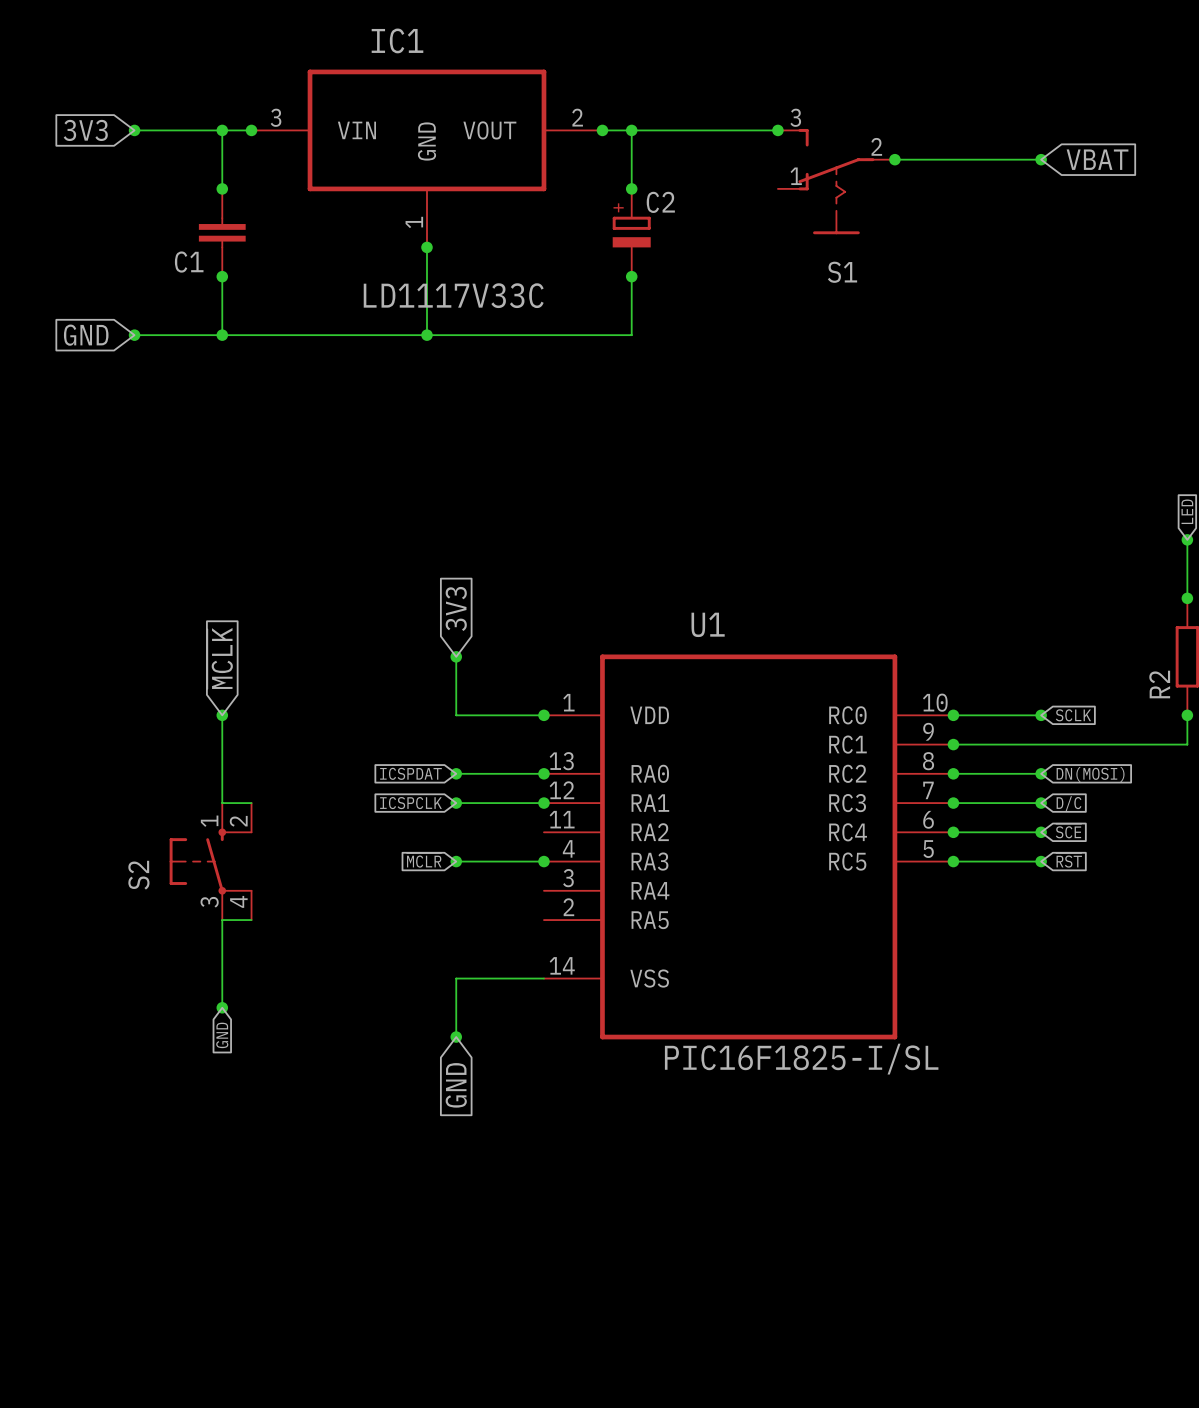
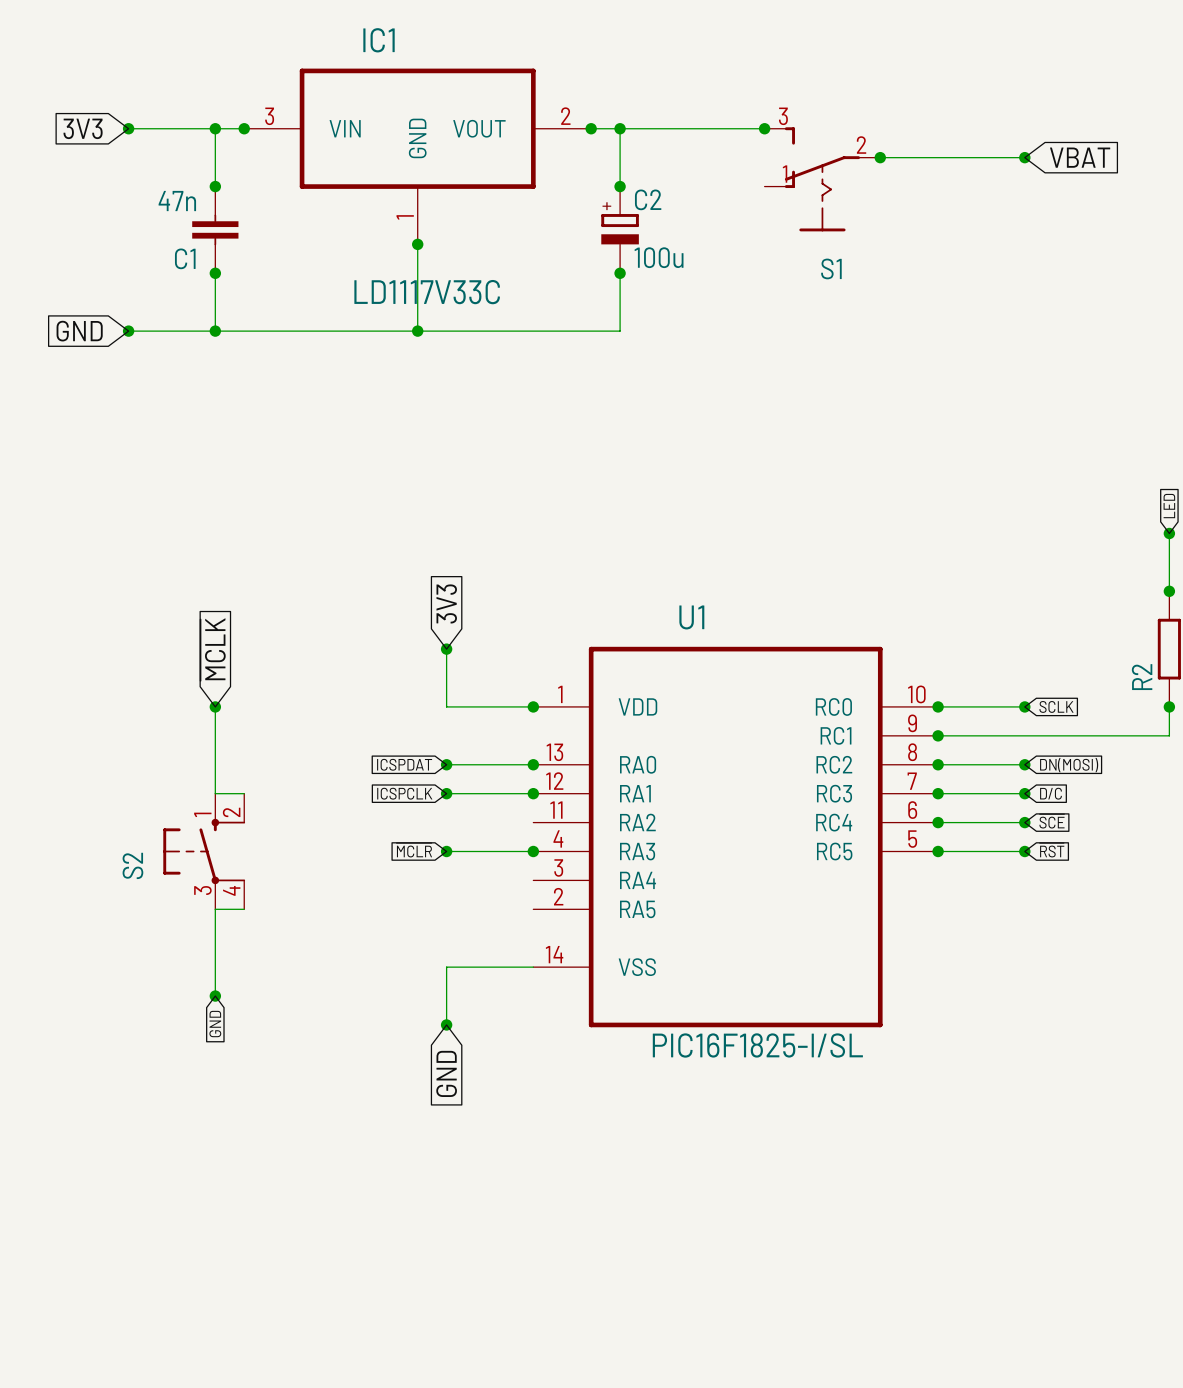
C1 value: none -> 47n (177, 201)
C2 value: none -> 100u (659, 257)

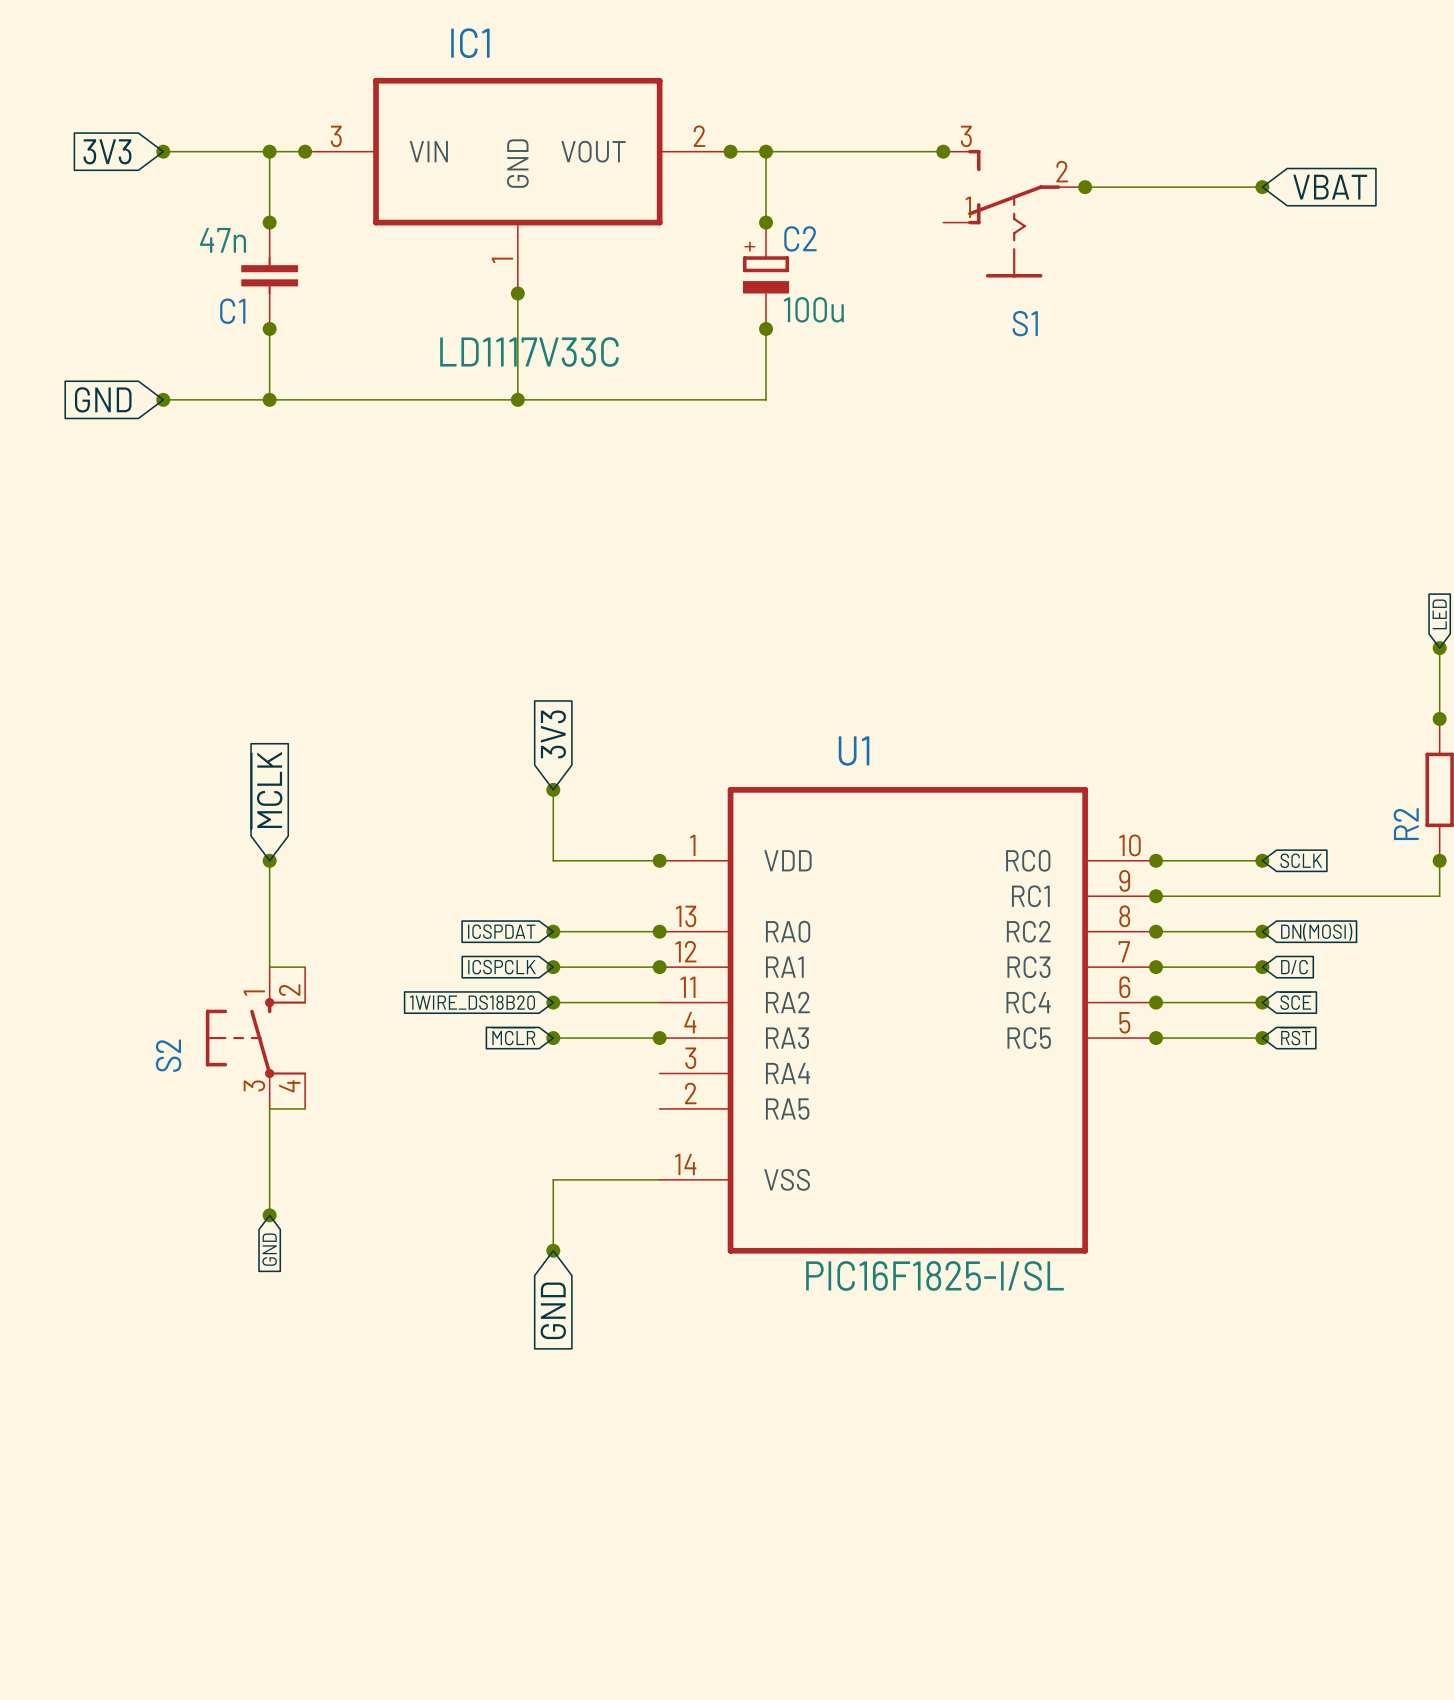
global label: none -> 1WIRE_DS18B20 (472, 1002)
wire: none -> (553, 1002) (659, 1002)
junction: none -> (553, 1002)

